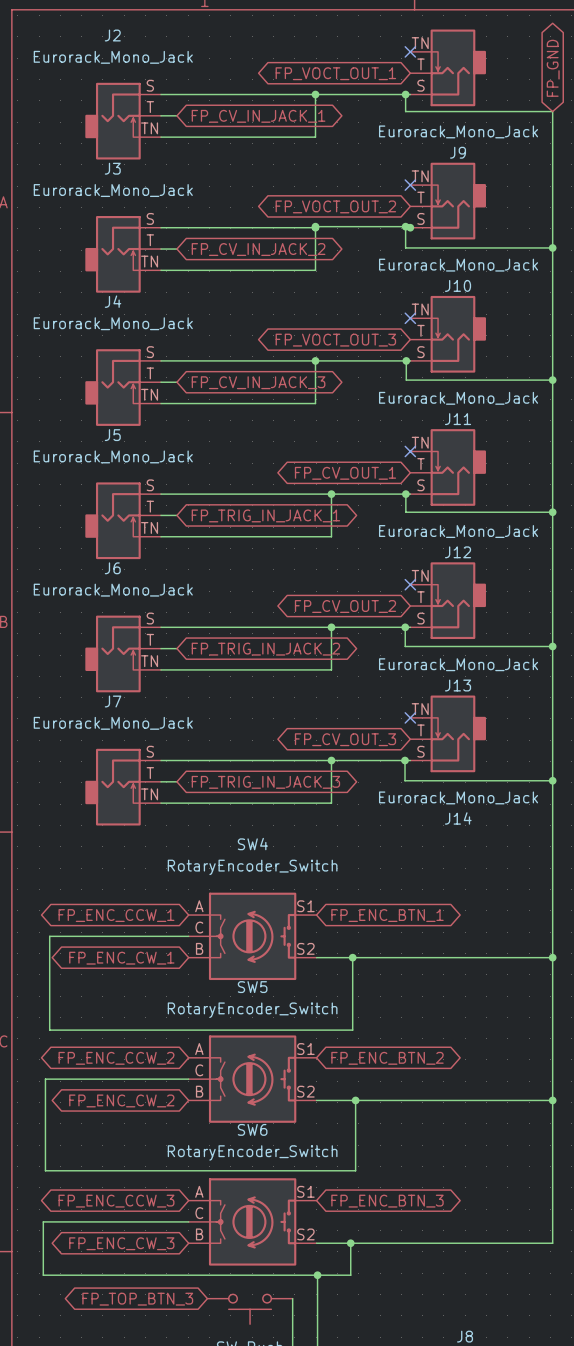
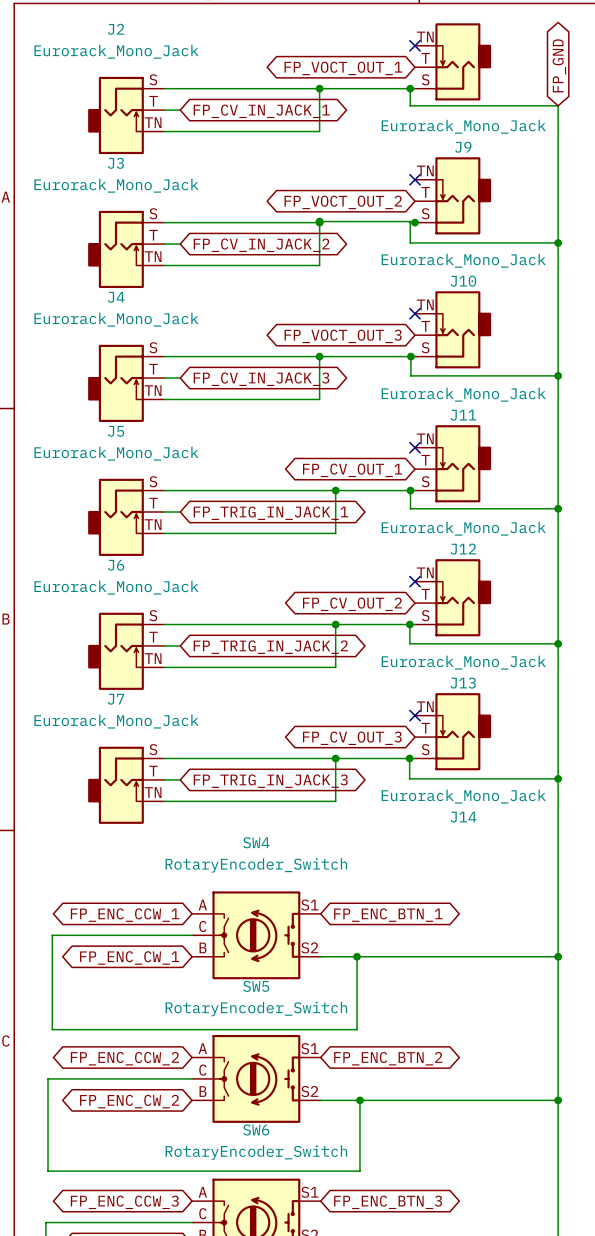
junction: (405, 226) -> none

